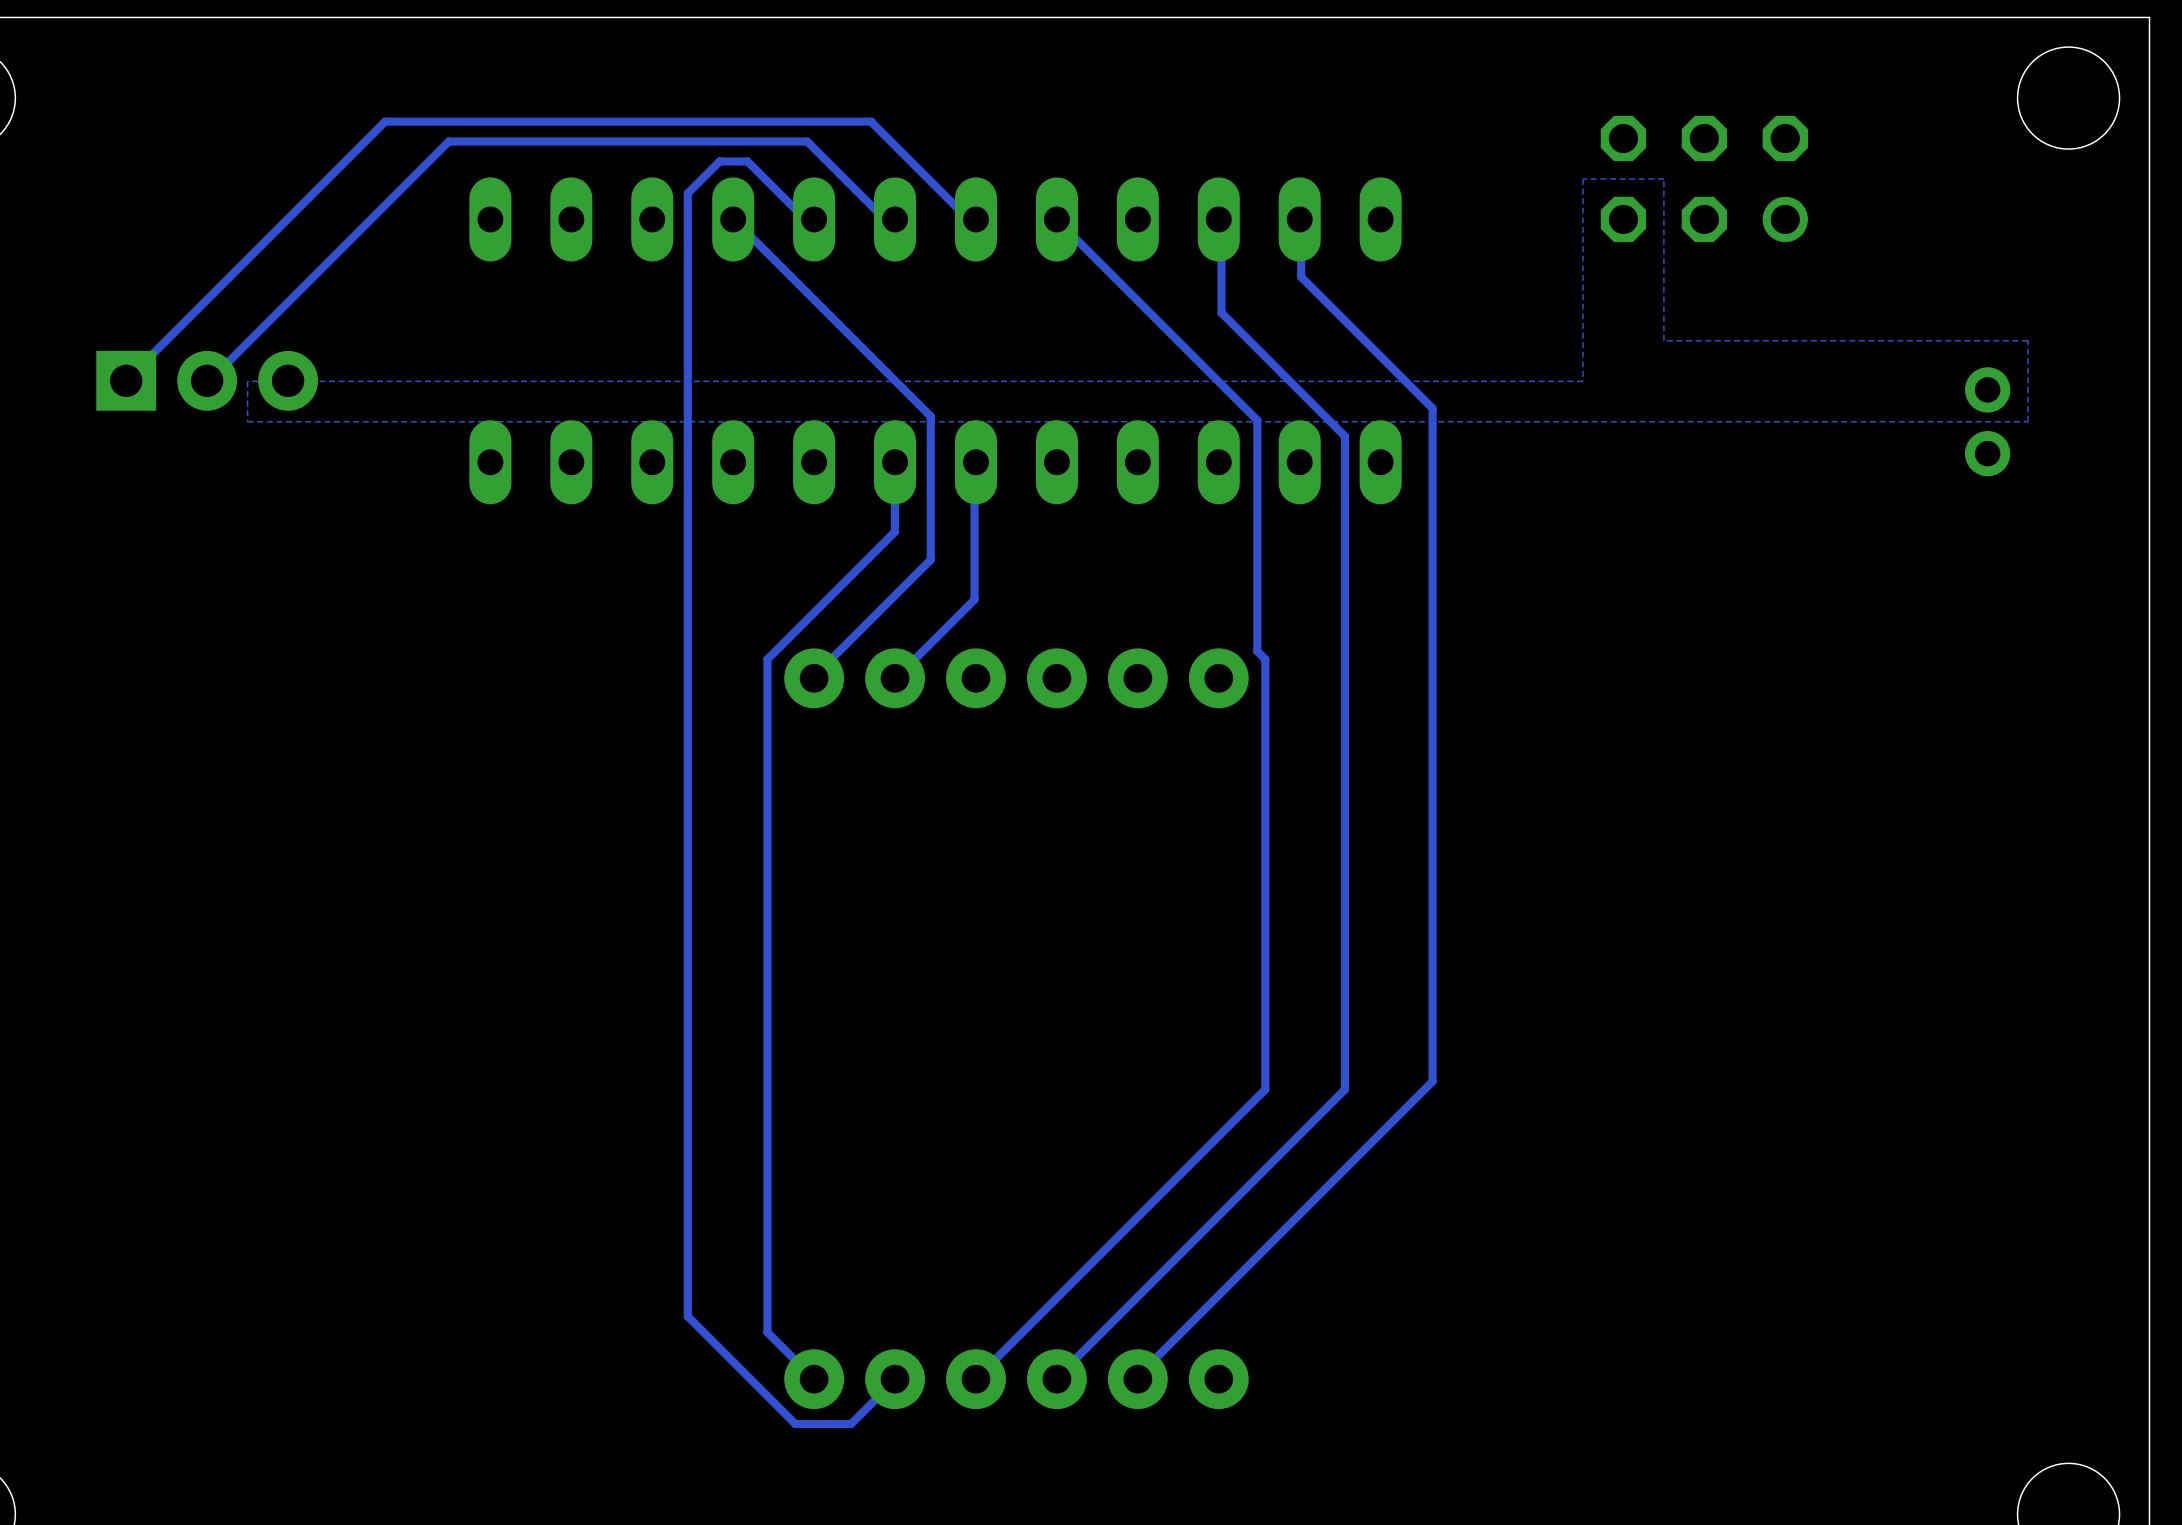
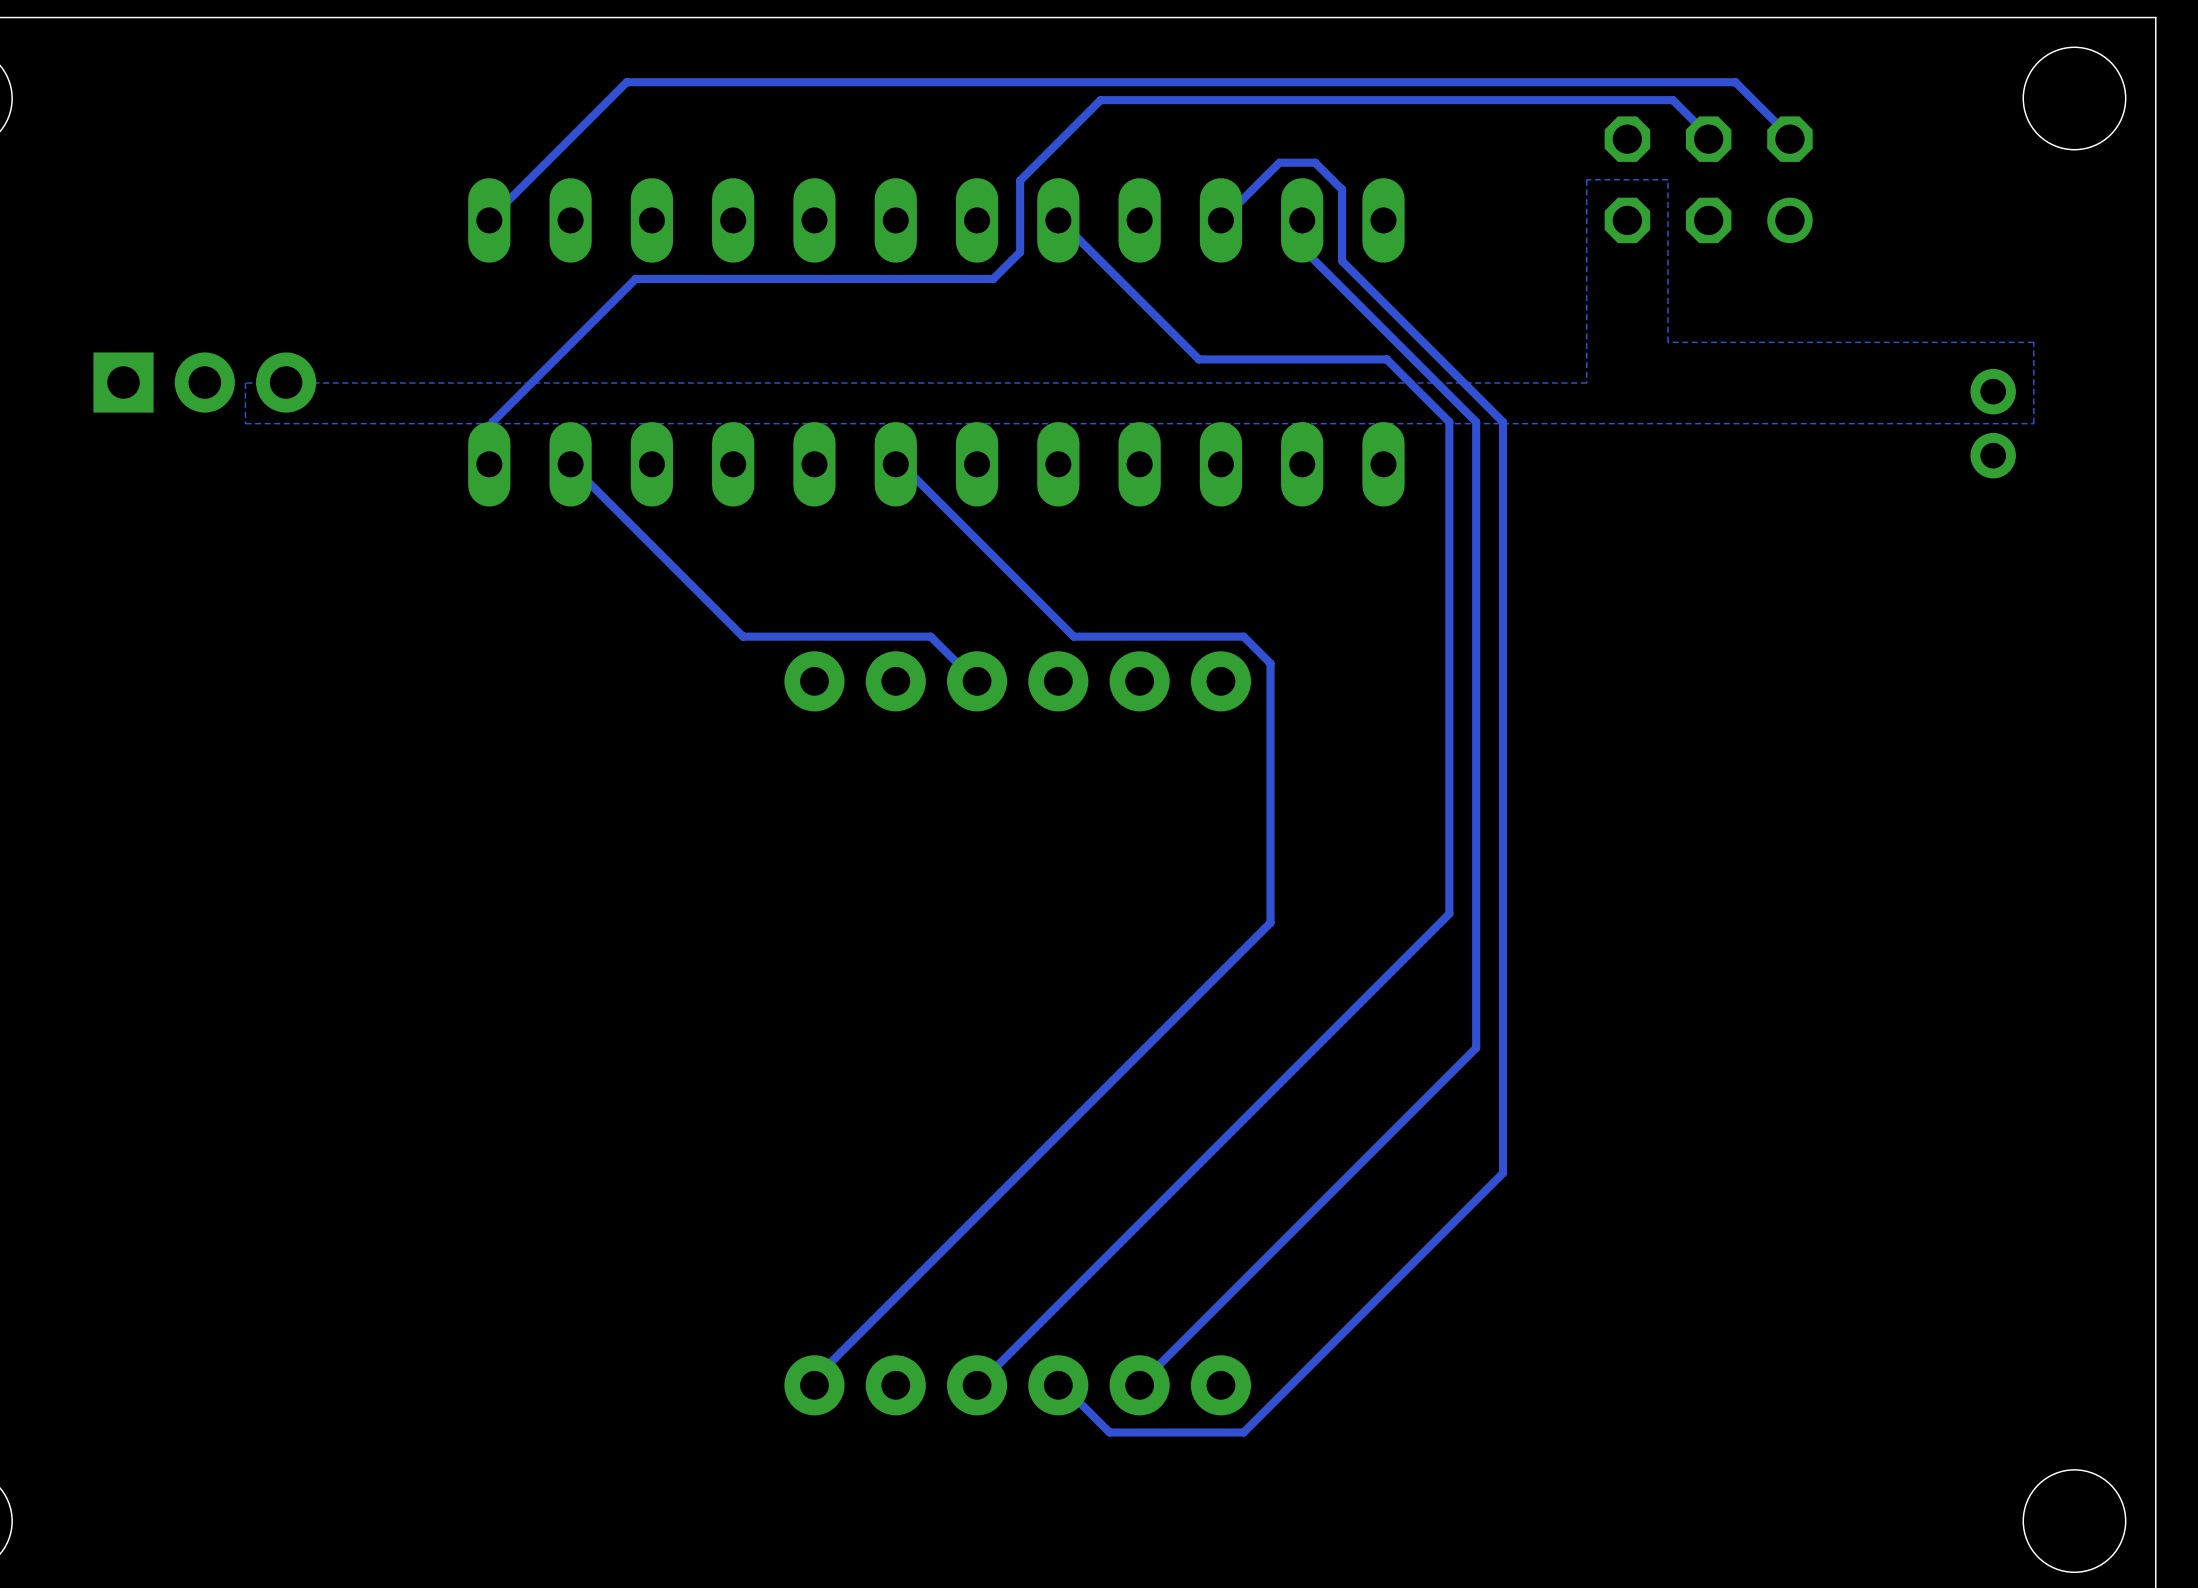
track: none -> (1708, 139) (1708, 135) (1672, 100) (1100, 100) (1020, 180) (1020, 252) (993, 278) (635, 278) (492, 422) (492, 457) (489, 464)
track: none -> (1789, 139) (1789, 135) (1735, 82) (626, 82) (489, 220)
track: (733, 219) (930, 416) (930, 559) (814, 678) -> none
track: (814, 219) (811, 217) (803, 217) (747, 161) (719, 161) (687, 193) (687, 1316) (795, 1424) (851, 1424) (895, 1379) -> none
track: (895, 219) (894, 217) (882, 217) (807, 141) (448, 141) (209, 380) (207, 380) -> none
track: (976, 219) (974, 217) (966, 217) (871, 121) (385, 121) (126, 380) -> none
track: (1056, 219) (1257, 420) (1257, 651) (1265, 659) (1265, 1089) (976, 1379) -> (1058, 220) (1198, 359) (1386, 359) (1449, 422) (1449, 913) (977, 1385)
track: (1218, 219) (1221, 221) (1221, 312) (1344, 436) (1344, 1089) (1056, 1379) -> (1220, 220) (1279, 162) (1315, 162) (1342, 189) (1342, 261) (1503, 422) (1503, 1173) (1243, 1432) (1109, 1432) (1064, 1387) (1058, 1385)
track: (1299, 219) (1301, 276) (1432, 408) (1432, 1081) (1137, 1376) (1137, 1379) -> (1302, 220) (1306, 225) (1306, 252) (1476, 422) (1476, 1047) (1139, 1385)
track: none -> (570, 464) (742, 636) (930, 636) (977, 681)
track: (895, 462) (894, 531) (767, 659) (767, 1332) (814, 1379) -> (895, 464) (903, 466) (1073, 636) (1243, 636) (1270, 663) (1270, 922) (814, 1378) (814, 1385)
track: (976, 462) (974, 599) (895, 678) -> none

